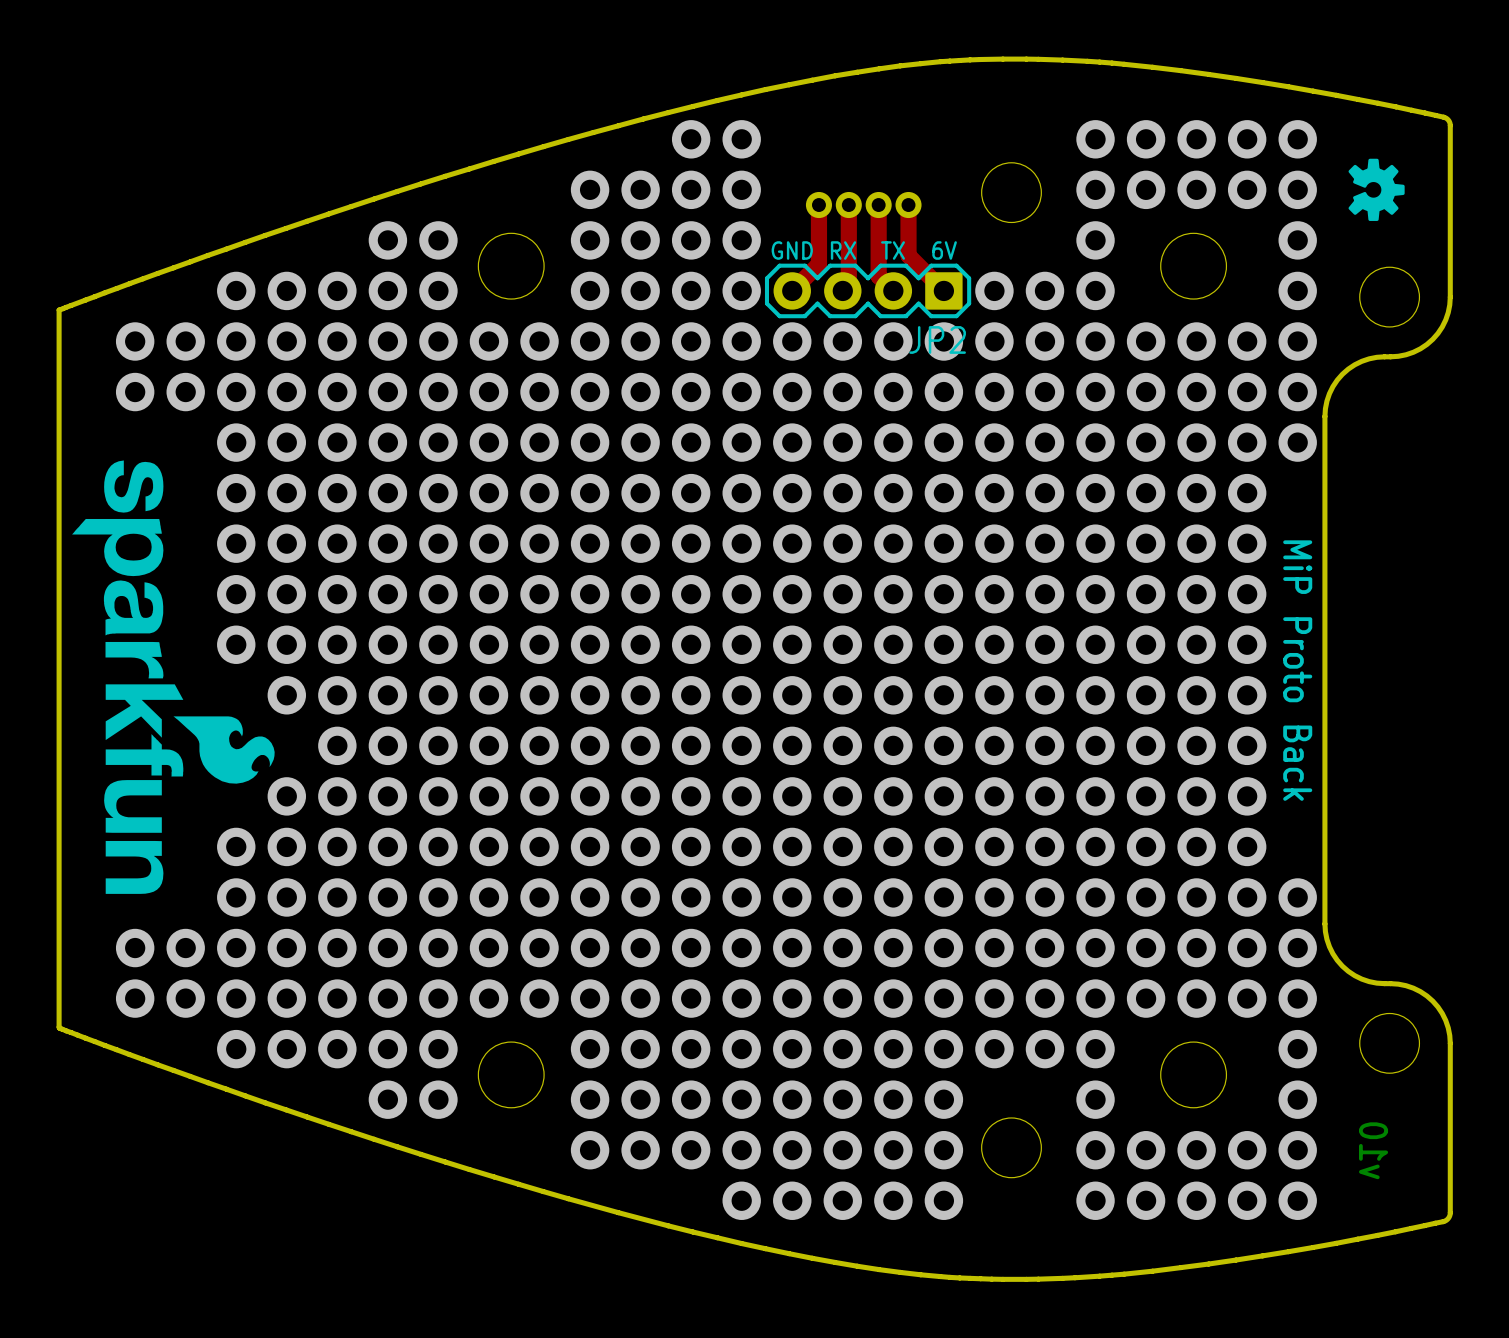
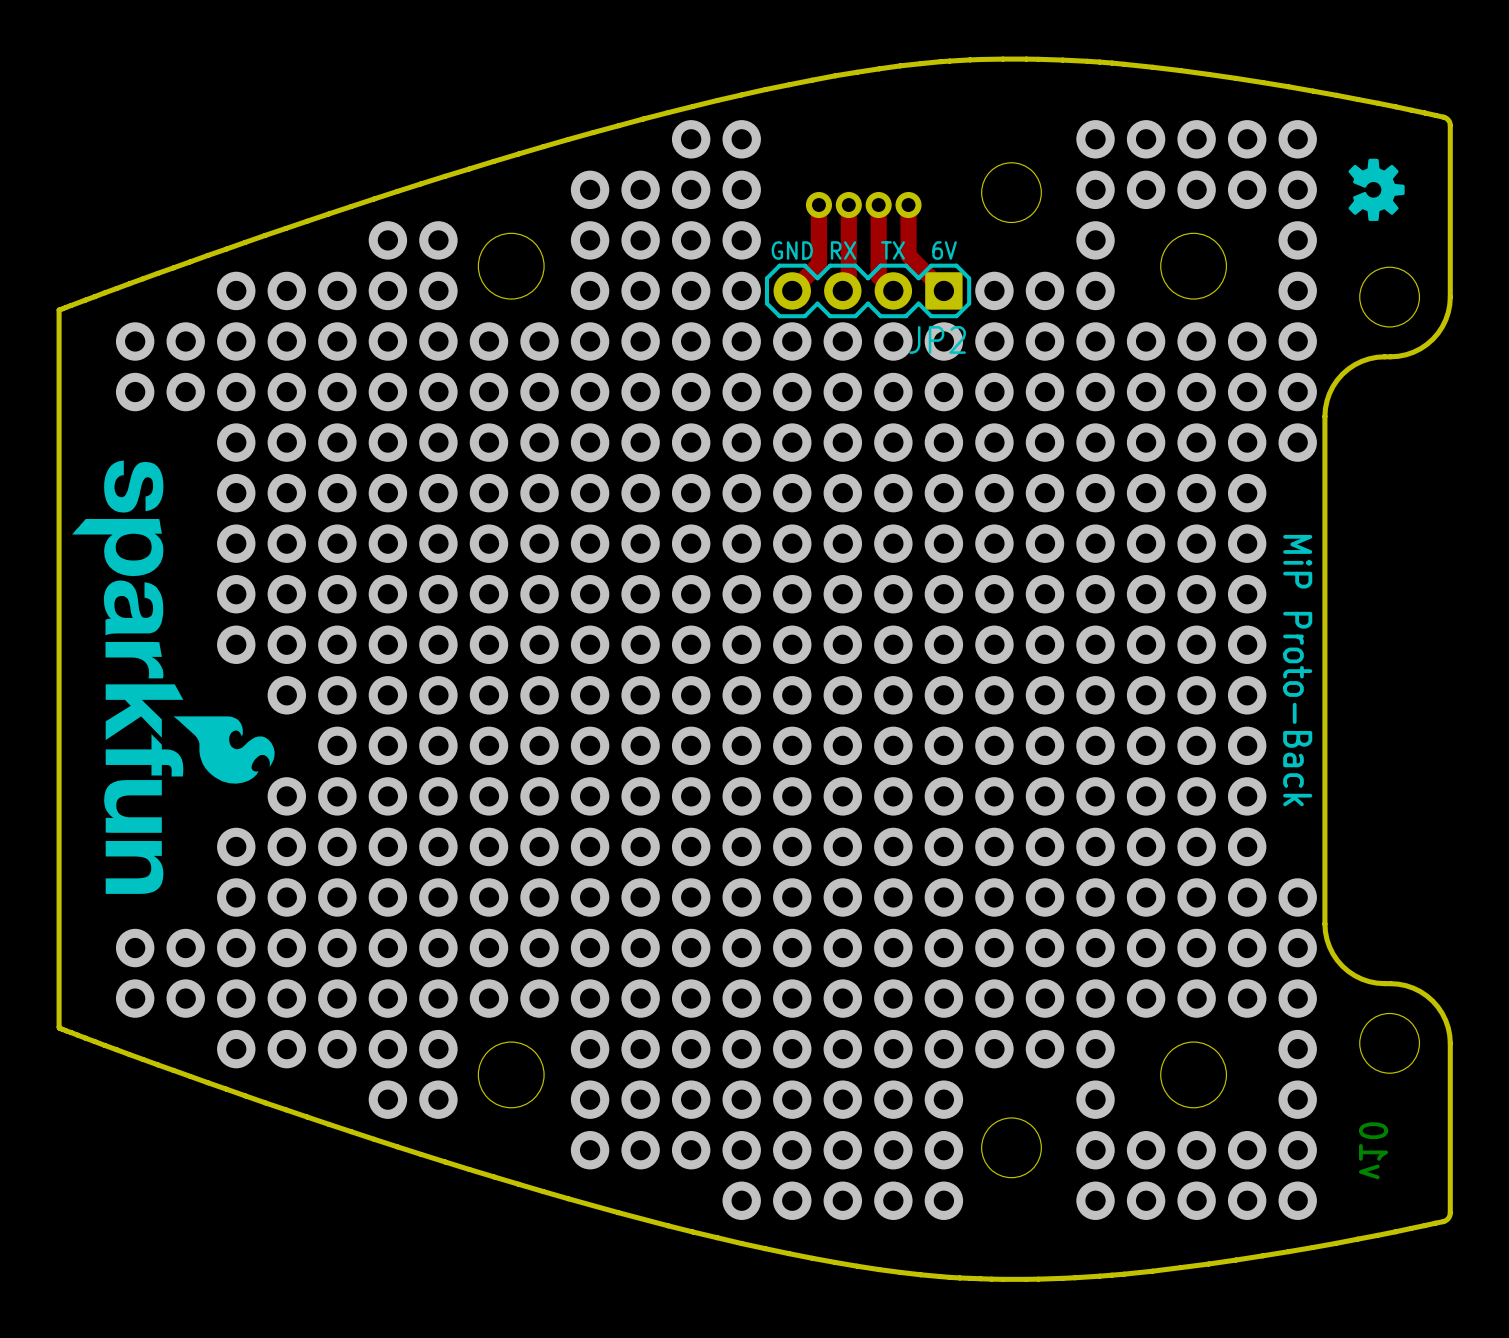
text: MiP Proto Back (1297, 670) -> MiP Proto-Back (1297, 670)

